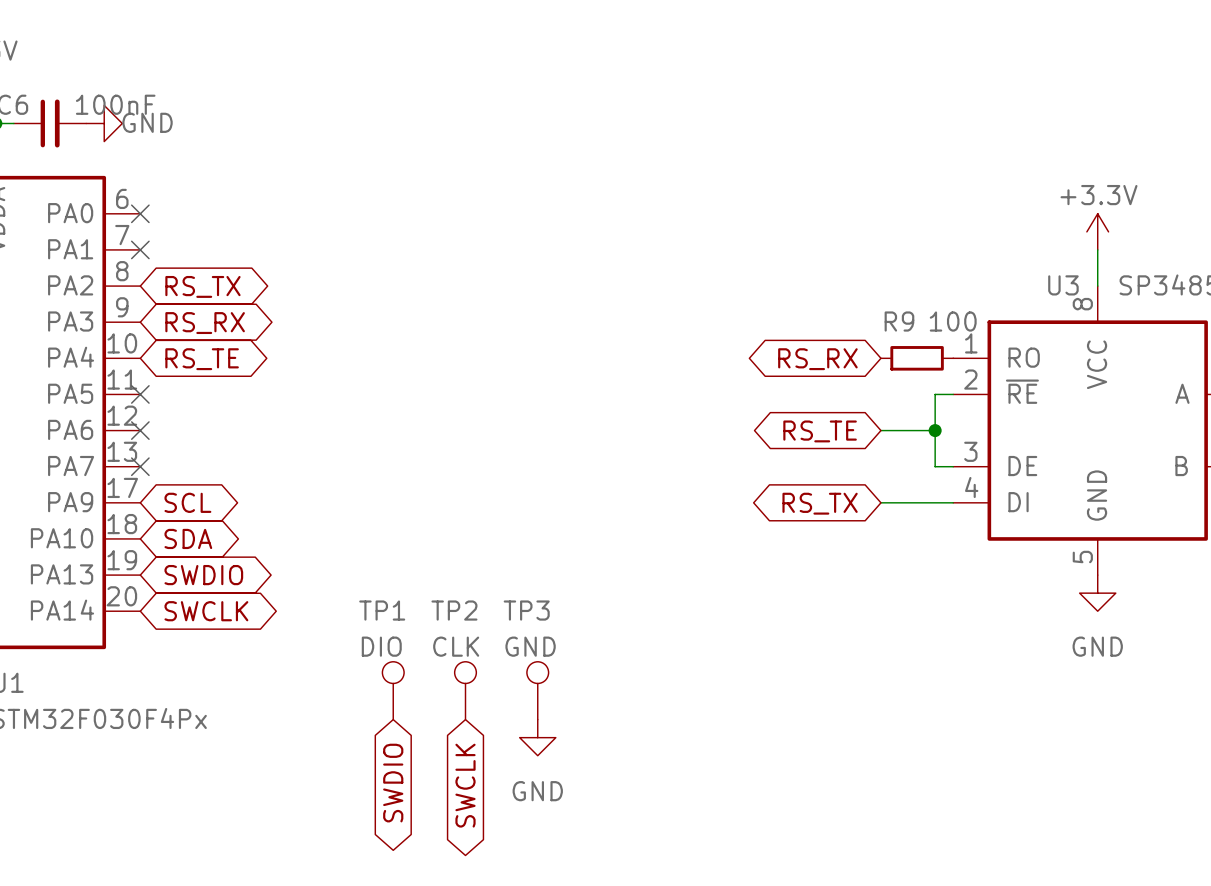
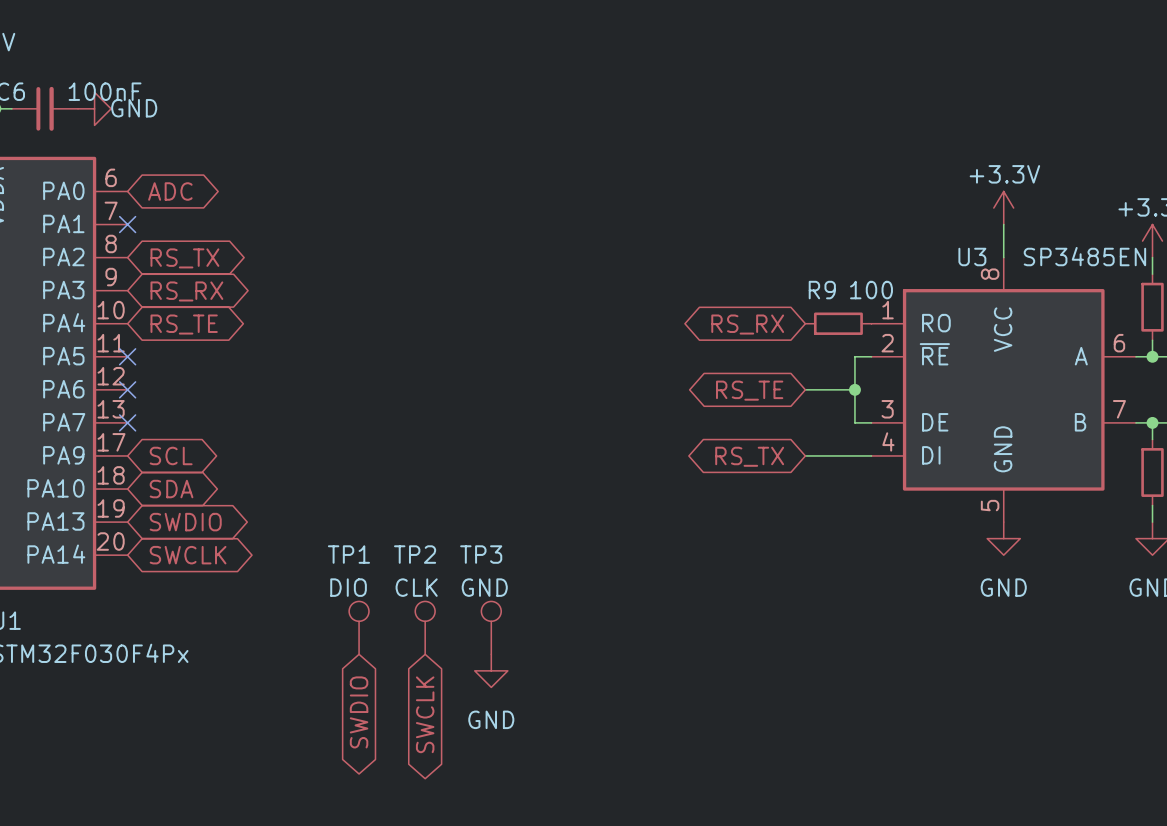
no-connect mark: (140, 213) -> none
global label: none -> ADC (170, 191)

